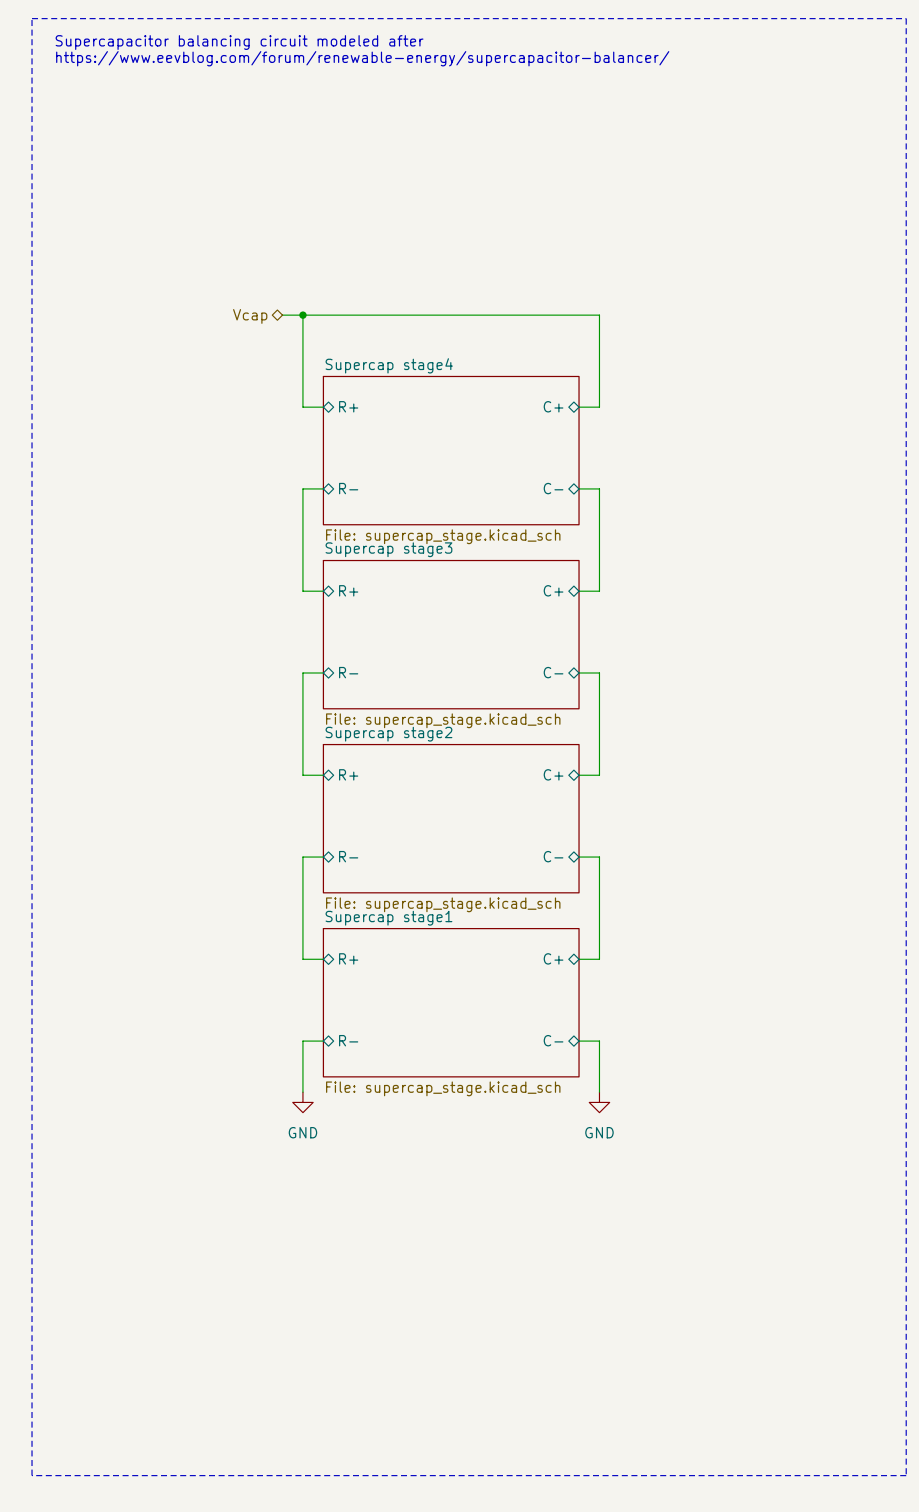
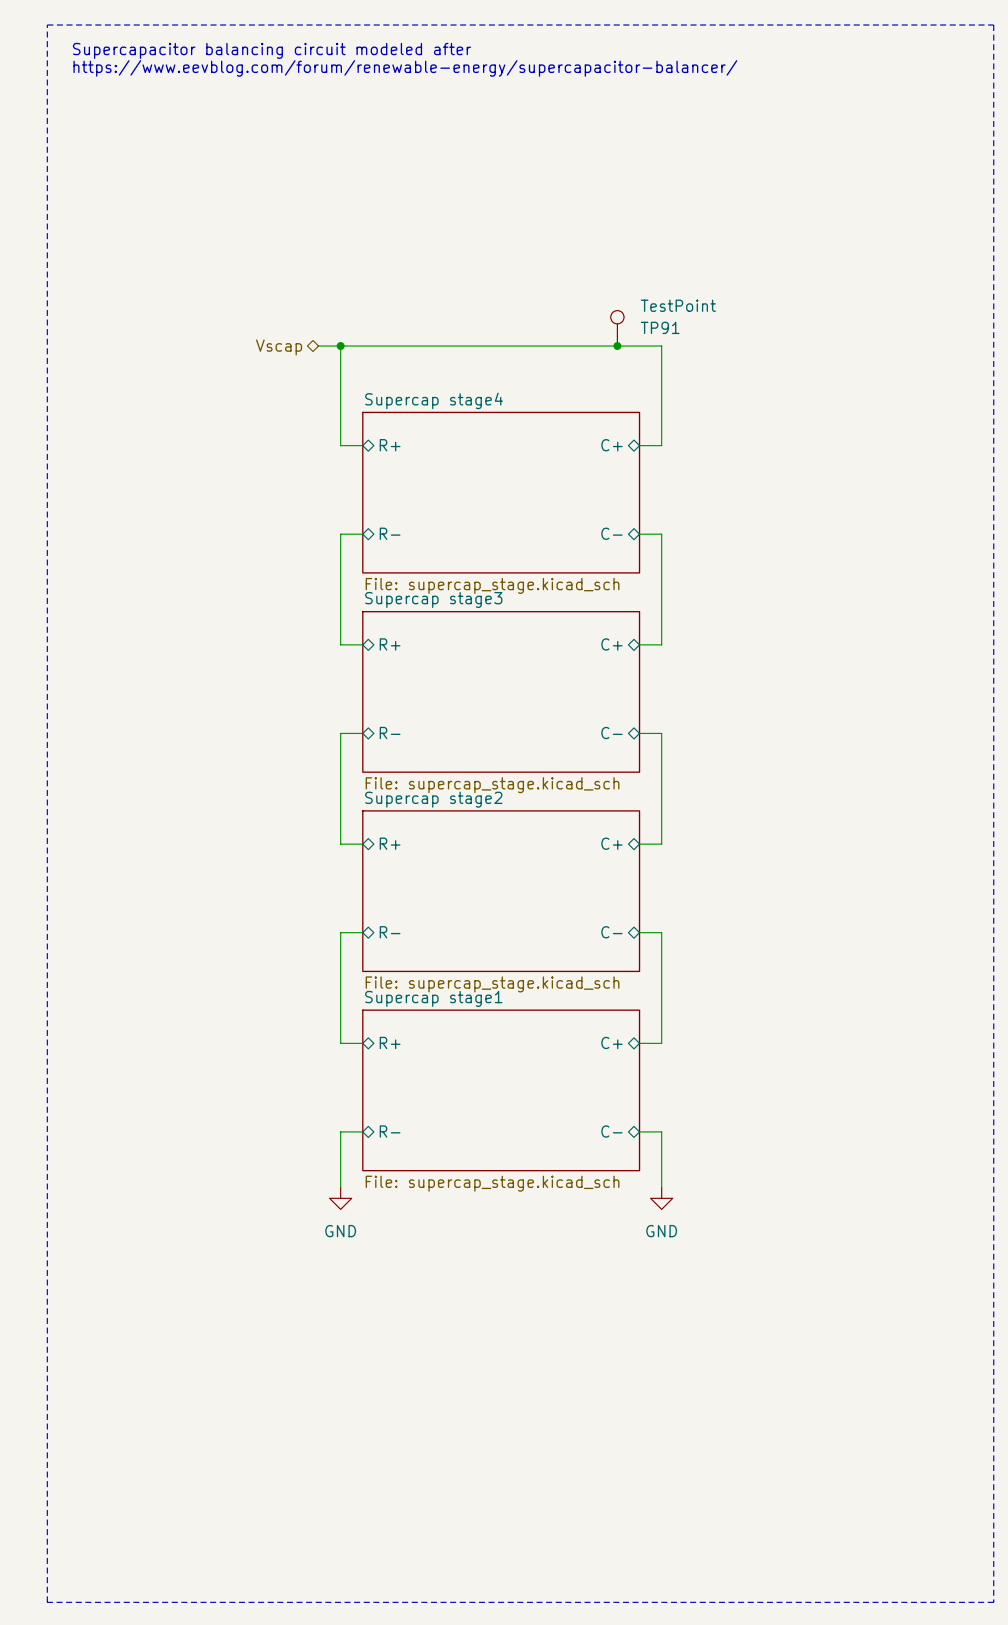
TP91: none -> TestPoint (617, 328)
junction: none -> (617, 346)
hierarchical label: Vcap (250, 316) -> Vscap (279, 347)

